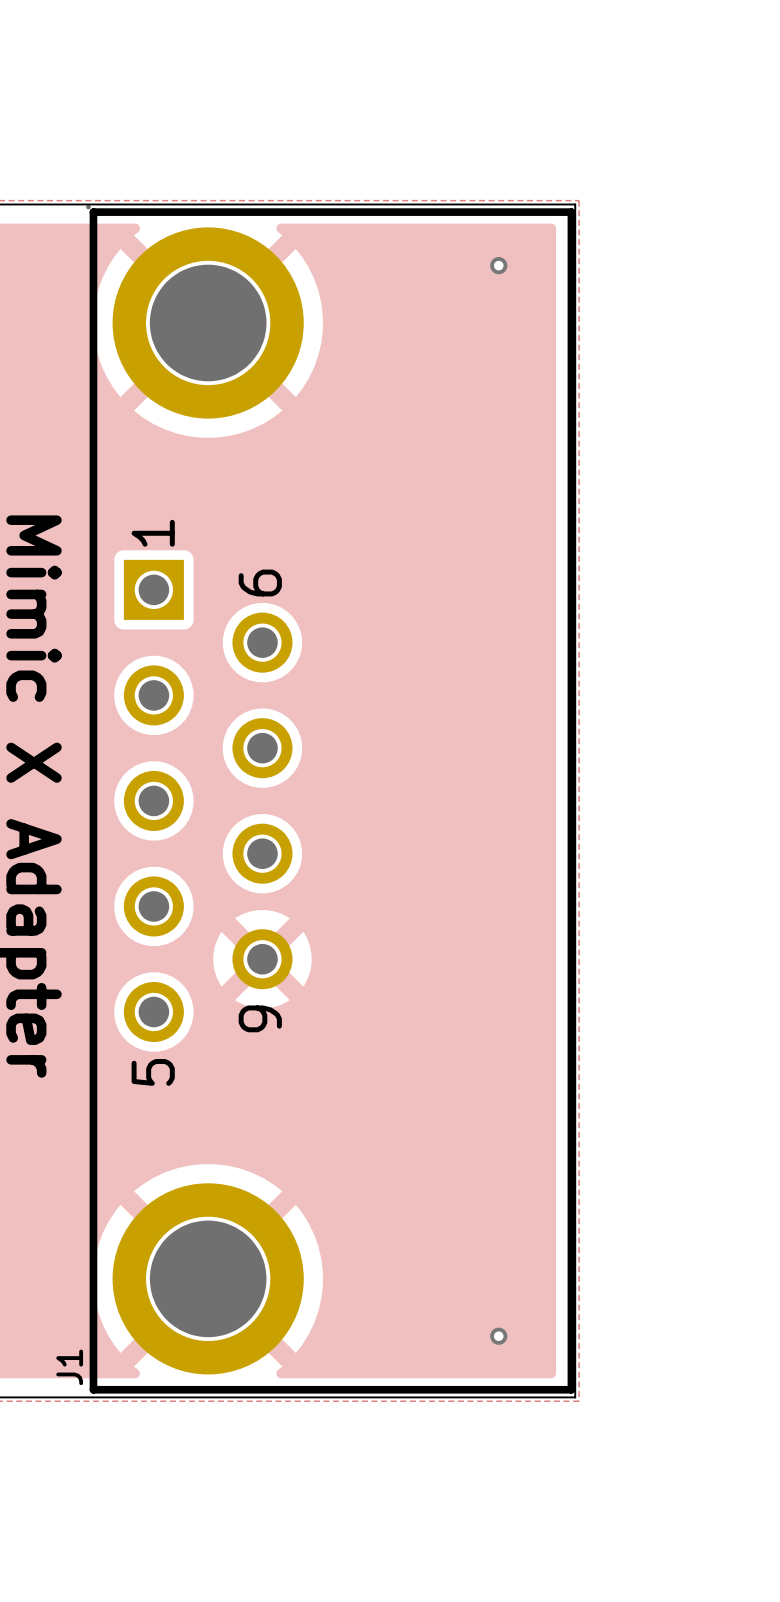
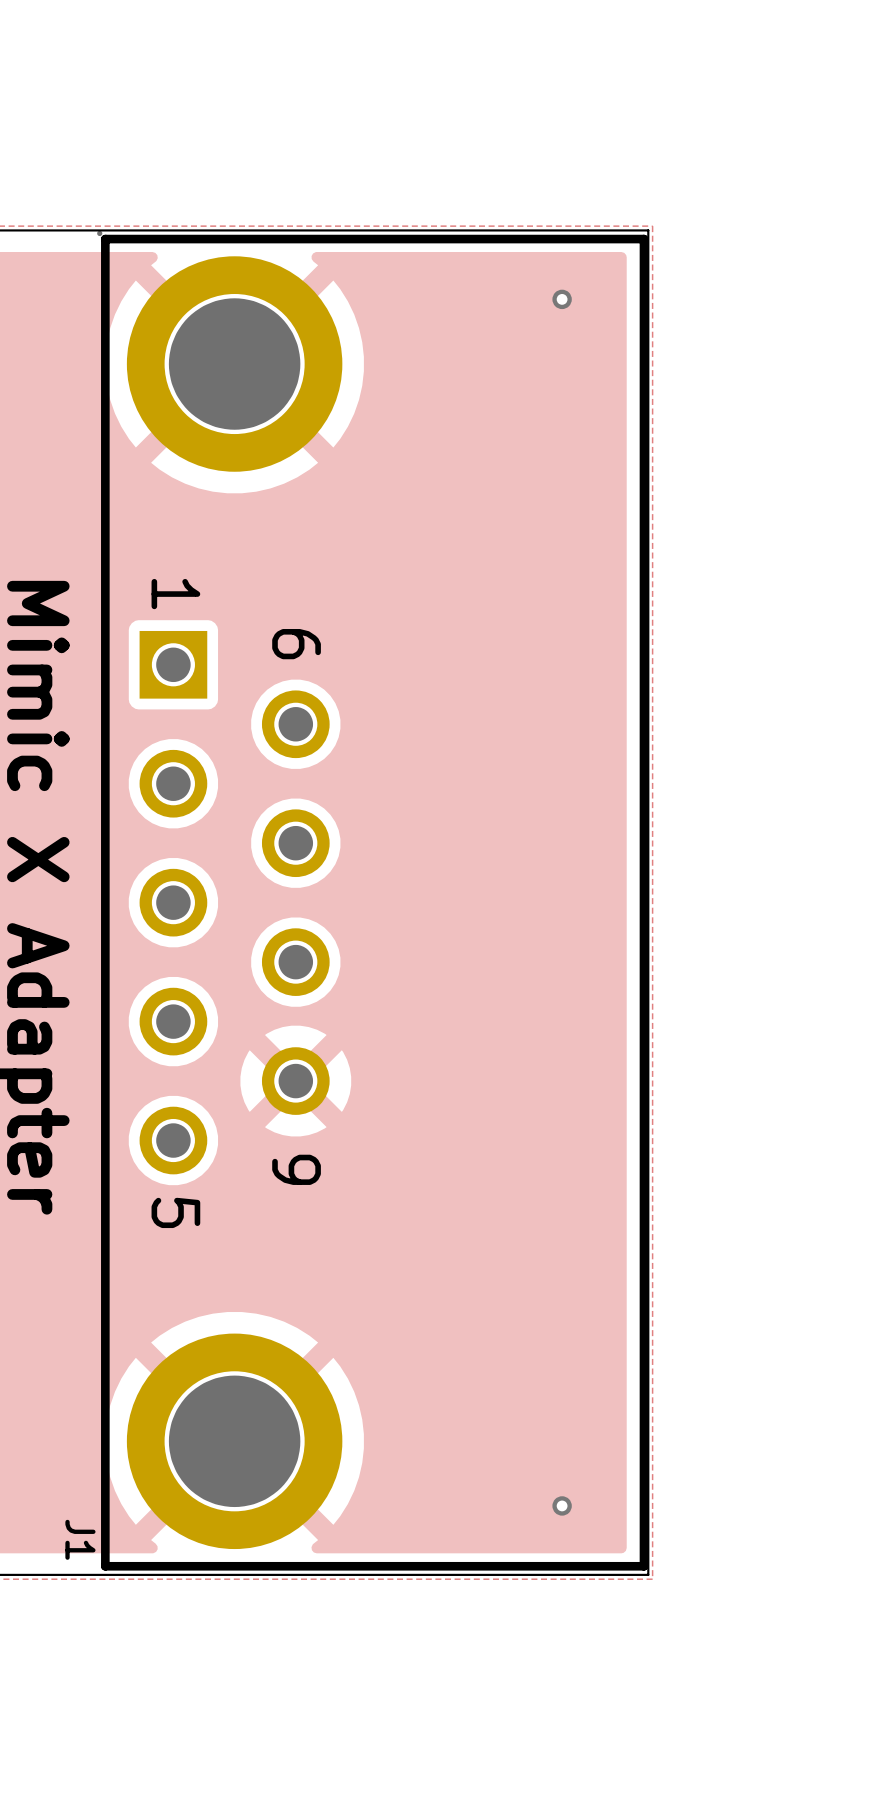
J1 text rotation: 0° (153, 533) -> 180° (175, 594)
J1 text rotation: 0° (260, 583) -> 180° (296, 644)
J1 text rotation: 0° (260, 1018) -> 180° (296, 1169)
J1 text rotation: 0° (153, 1072) -> 180° (175, 1212)
J1 name rotation: 0° (69, 1367) -> 180° (80, 1539)

